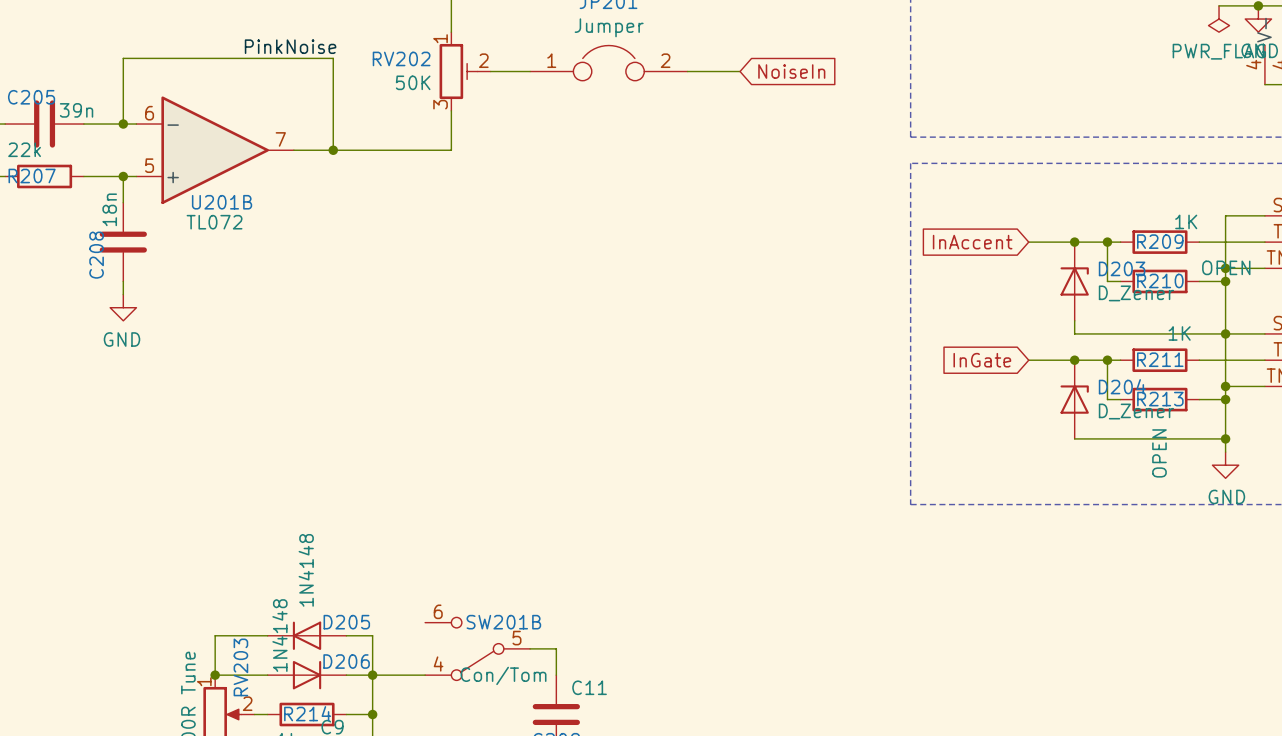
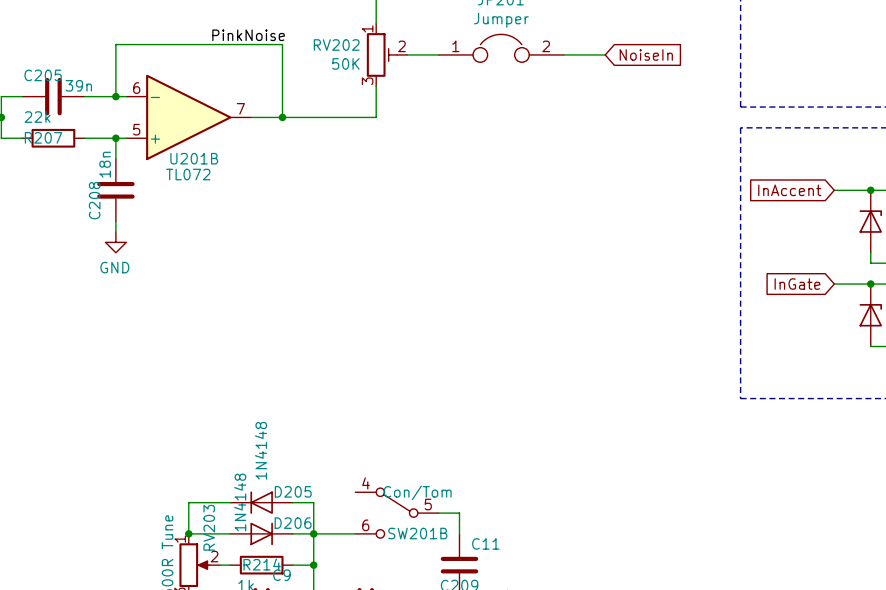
SW201B flip: as is (477, 648) -> up-down (397, 513)

